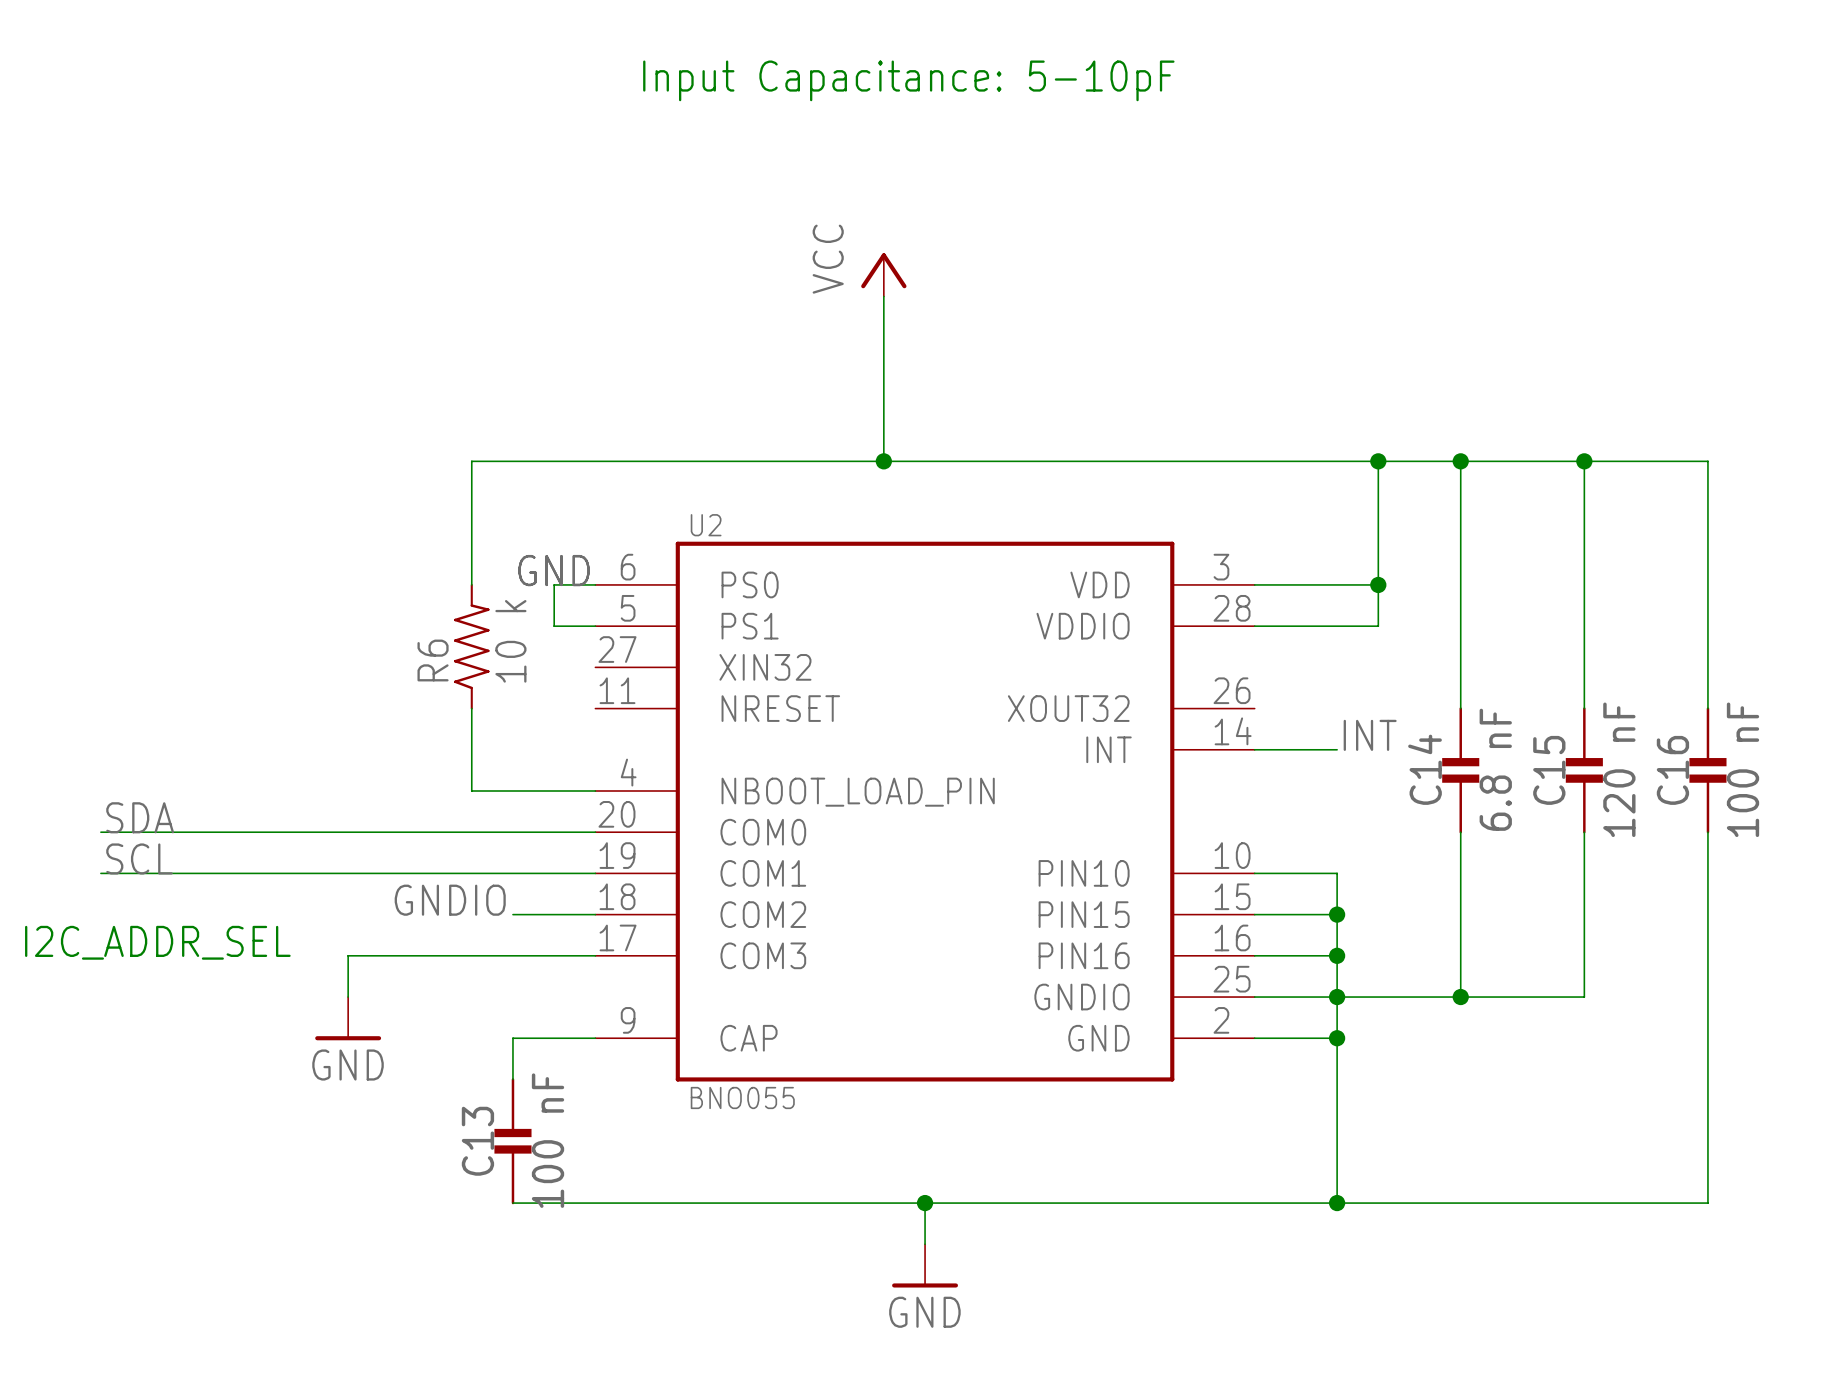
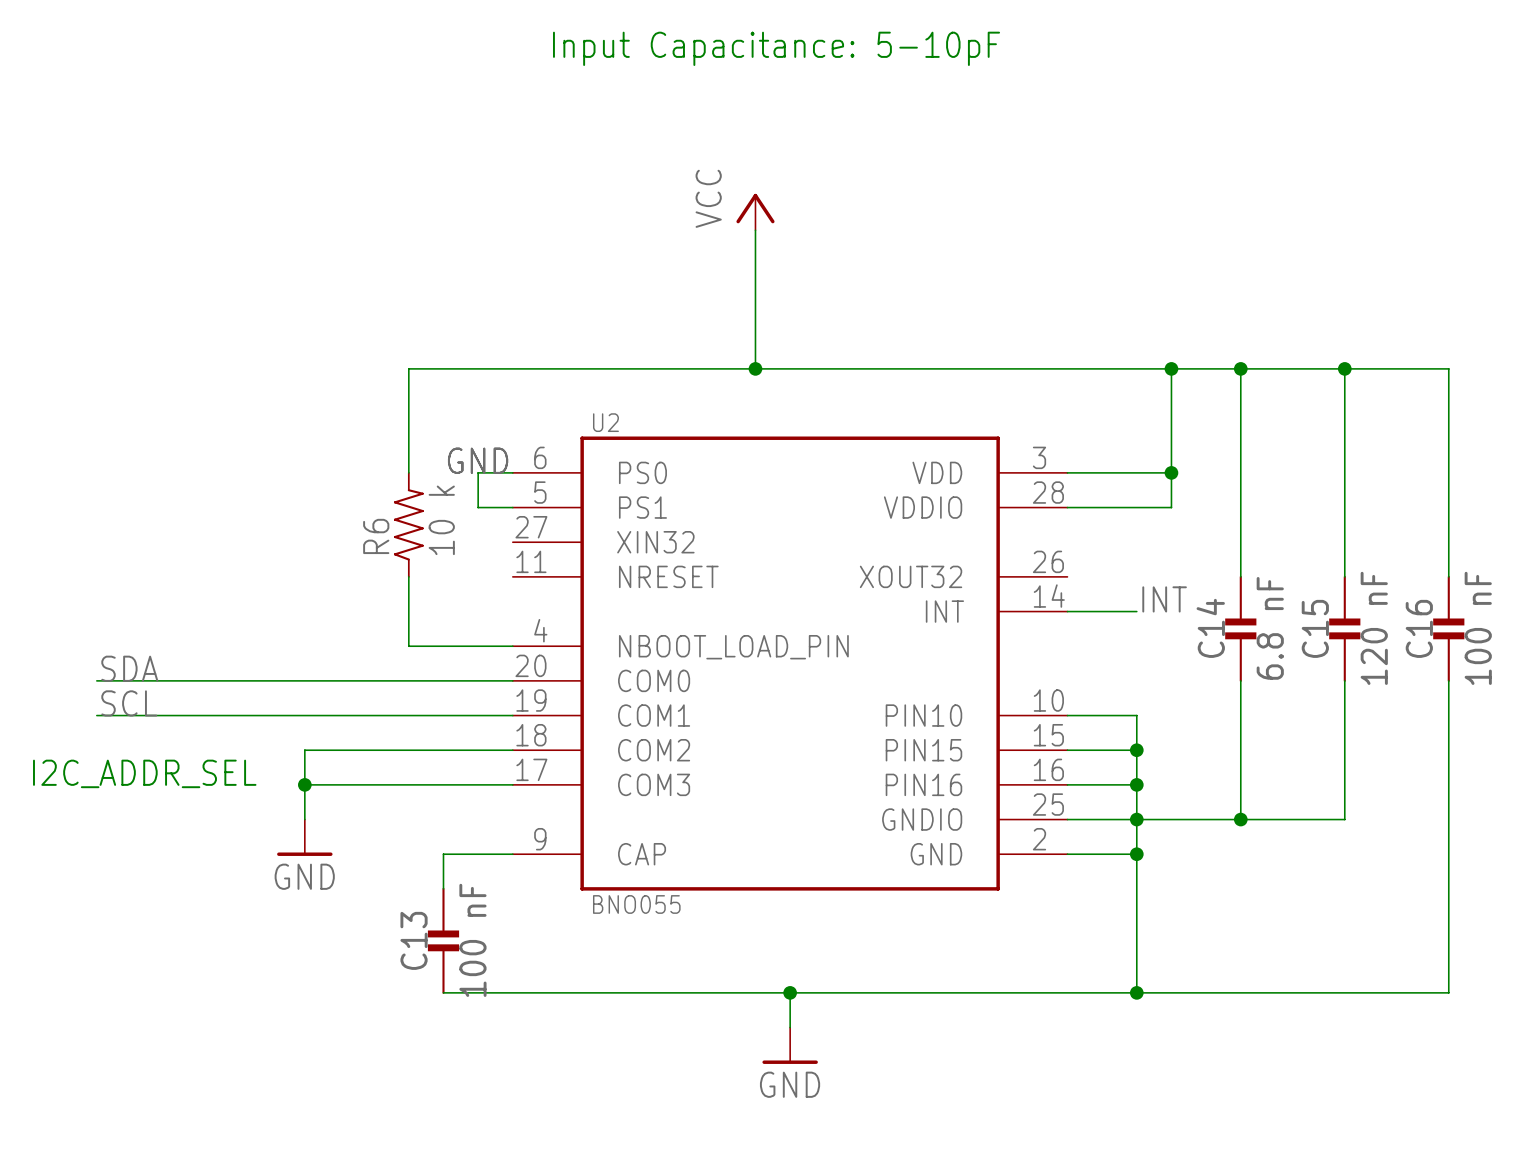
label: GNDIO (450, 900) -> none
wire: none -> (443, 750) (304, 750) (304, 784)
junction: none -> (304, 784)

